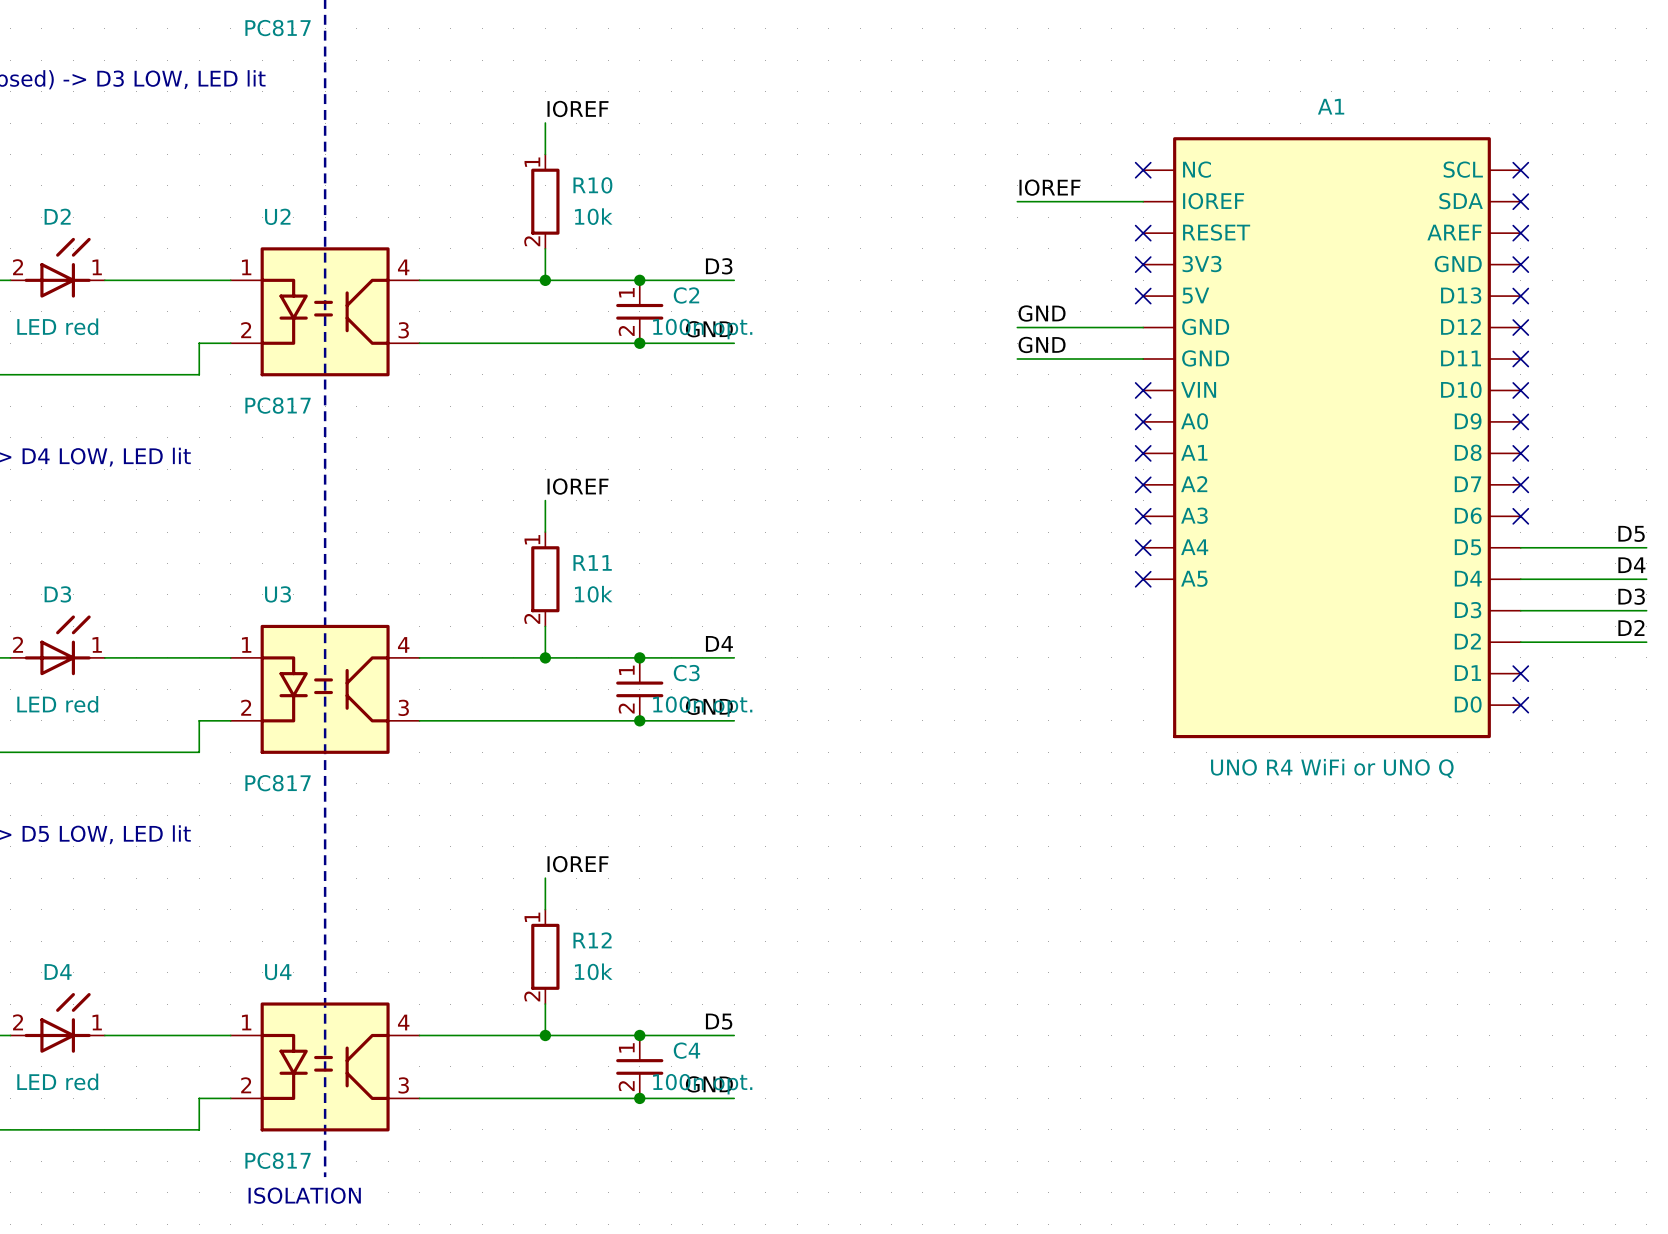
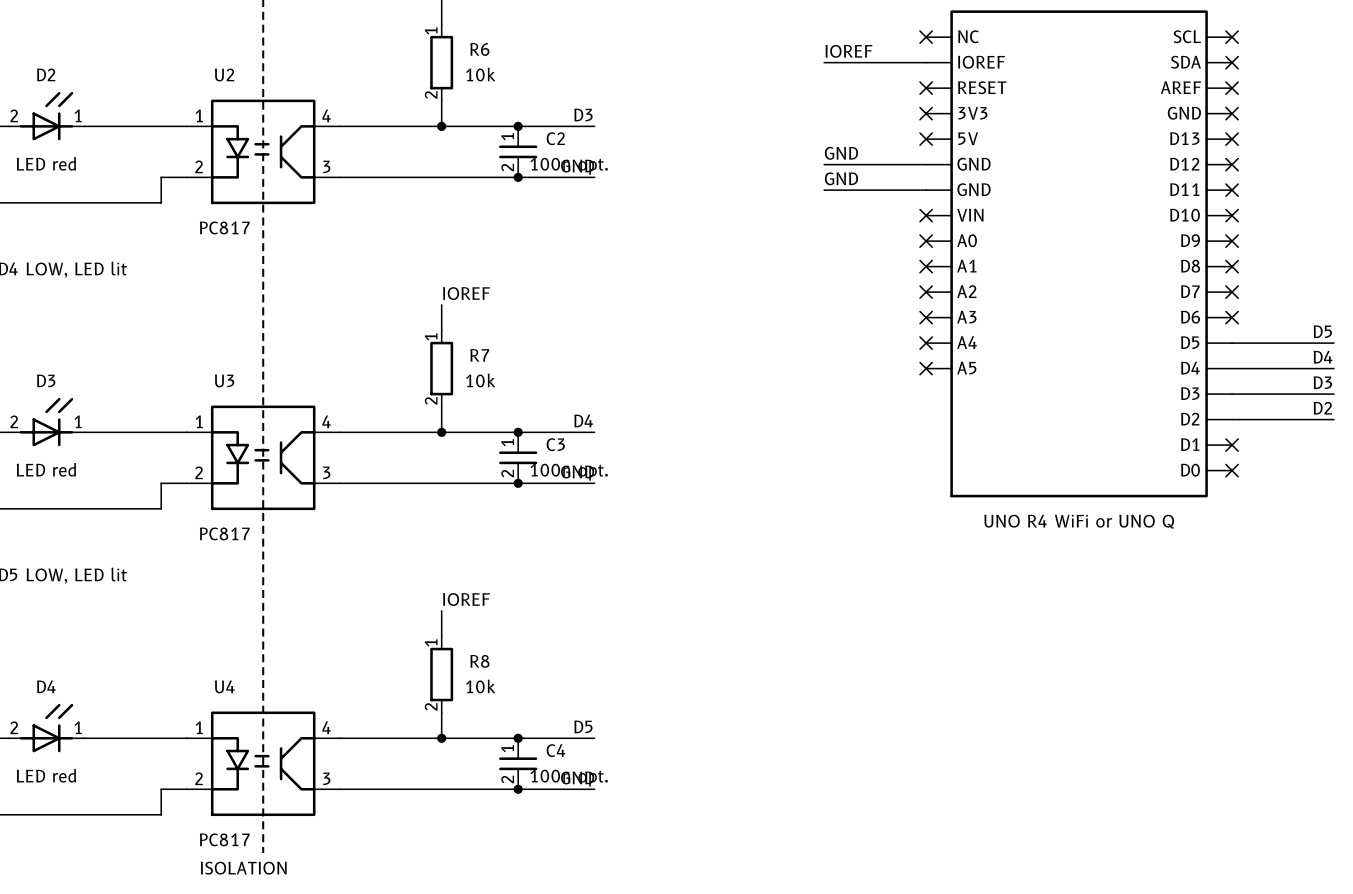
R10 name: R10 (592, 185) -> R6 (479, 49)
R11 name: R11 (592, 562) -> R7 (479, 355)
R12 name: R12 (592, 940) -> R8 (479, 661)

